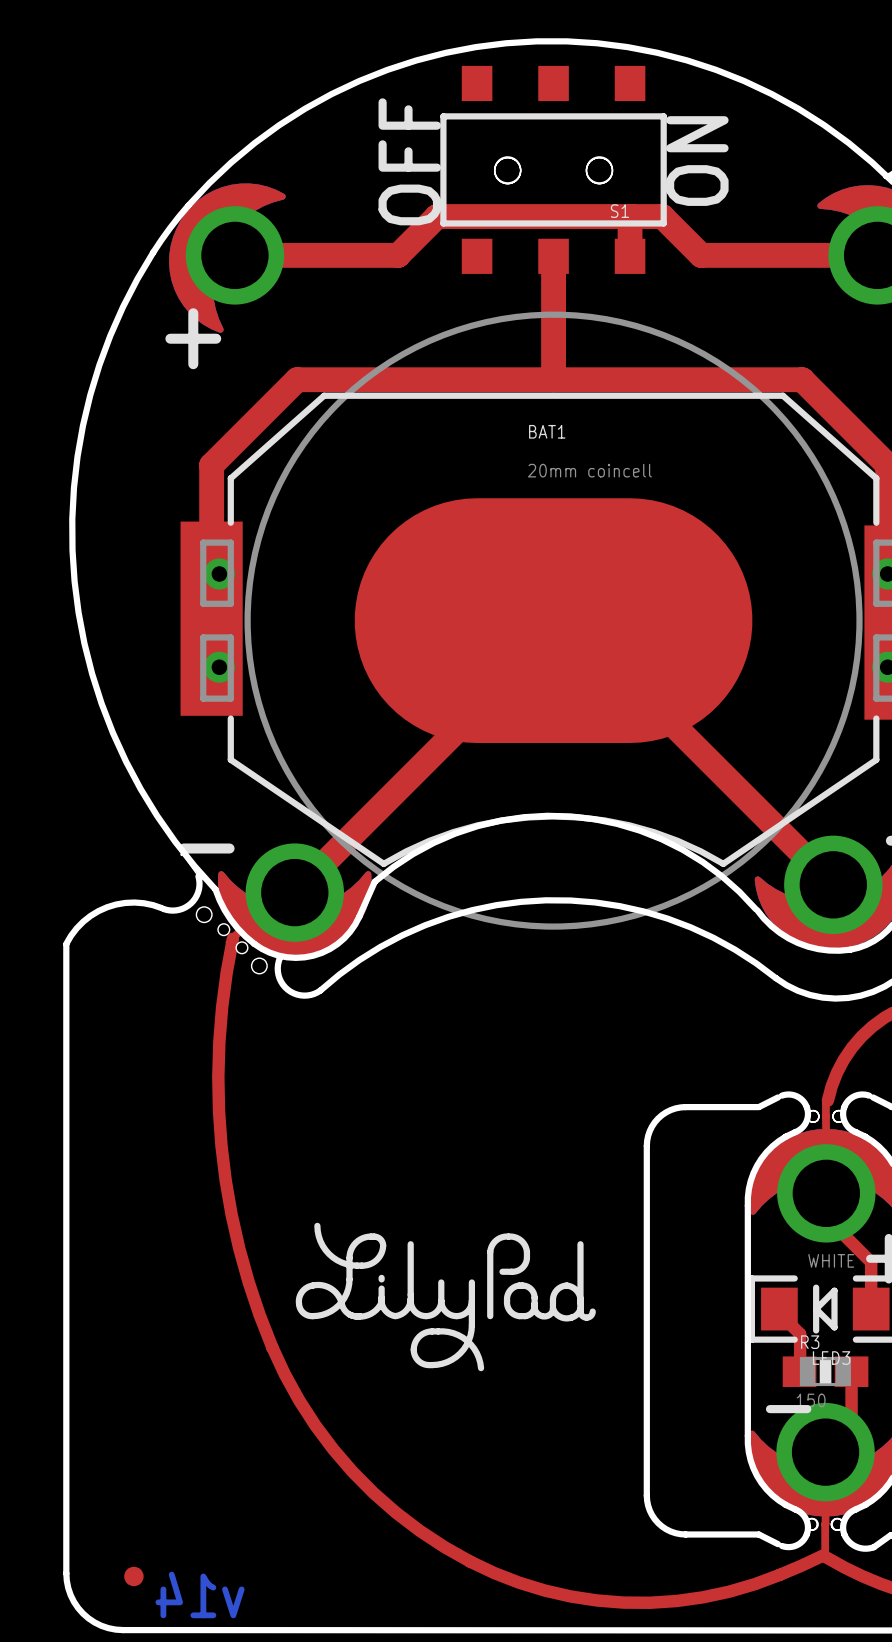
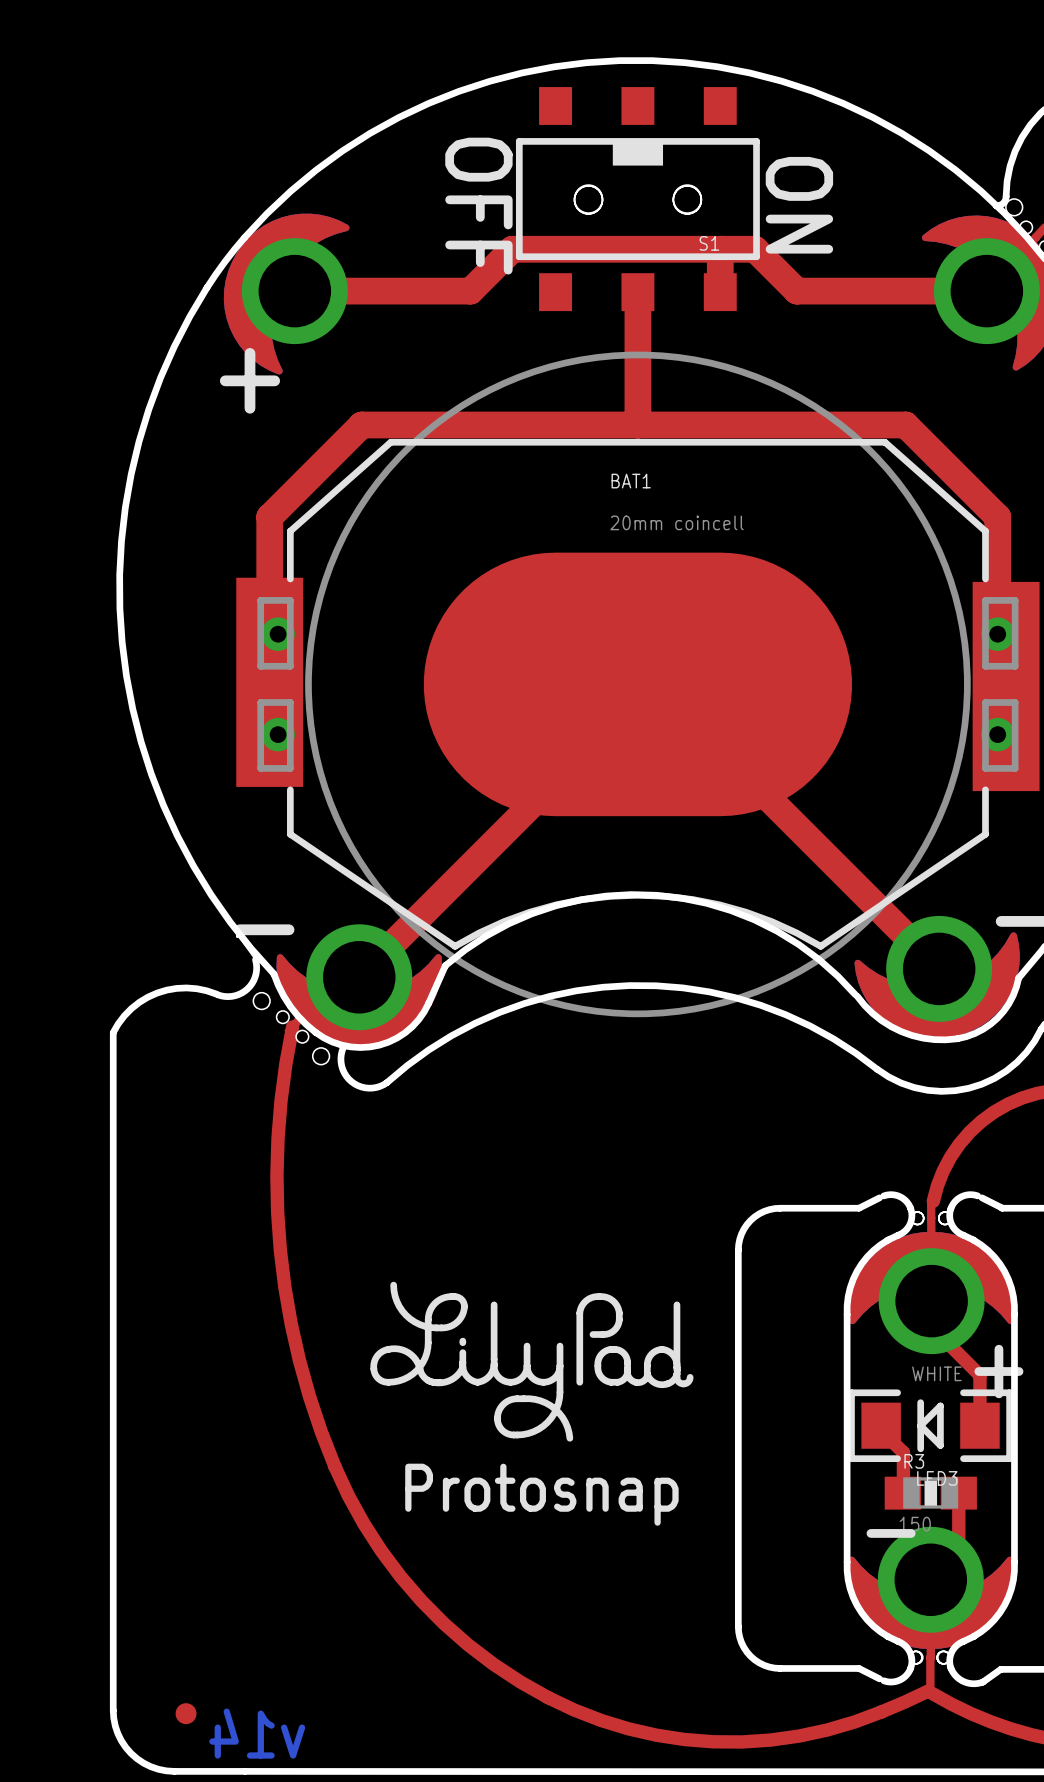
drawing: none -> [612, 140, 664, 166]
text rotation: 0° (409, 161) -> 180° (478, 206)
text rotation: 0° (697, 161) -> 180° (799, 205)
drawing position: (445, 1297) -> (531, 1361)
text: none -> Protosnap (541, 1494)

